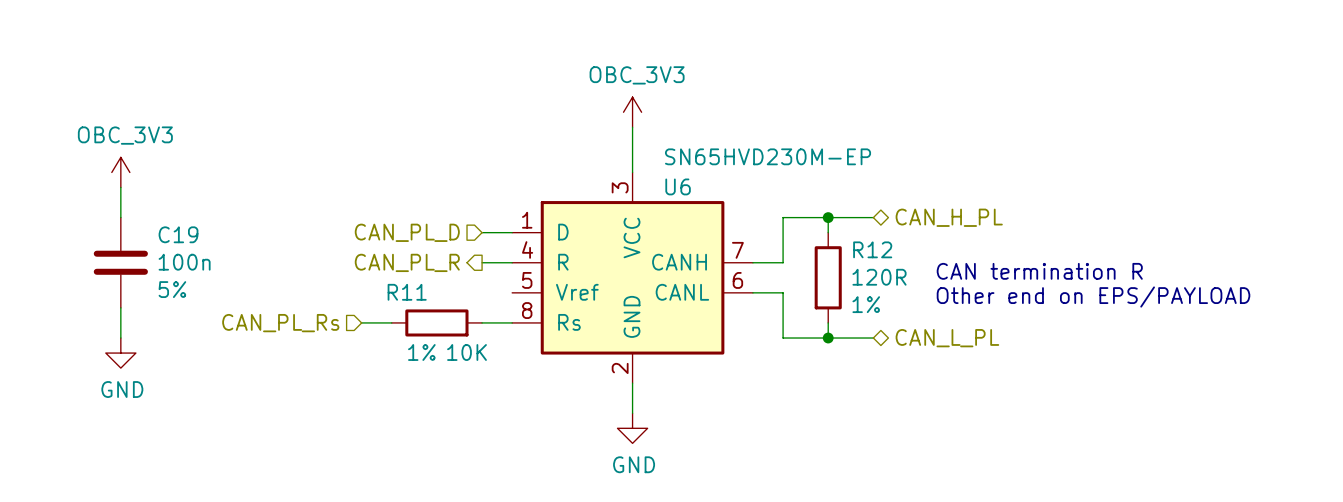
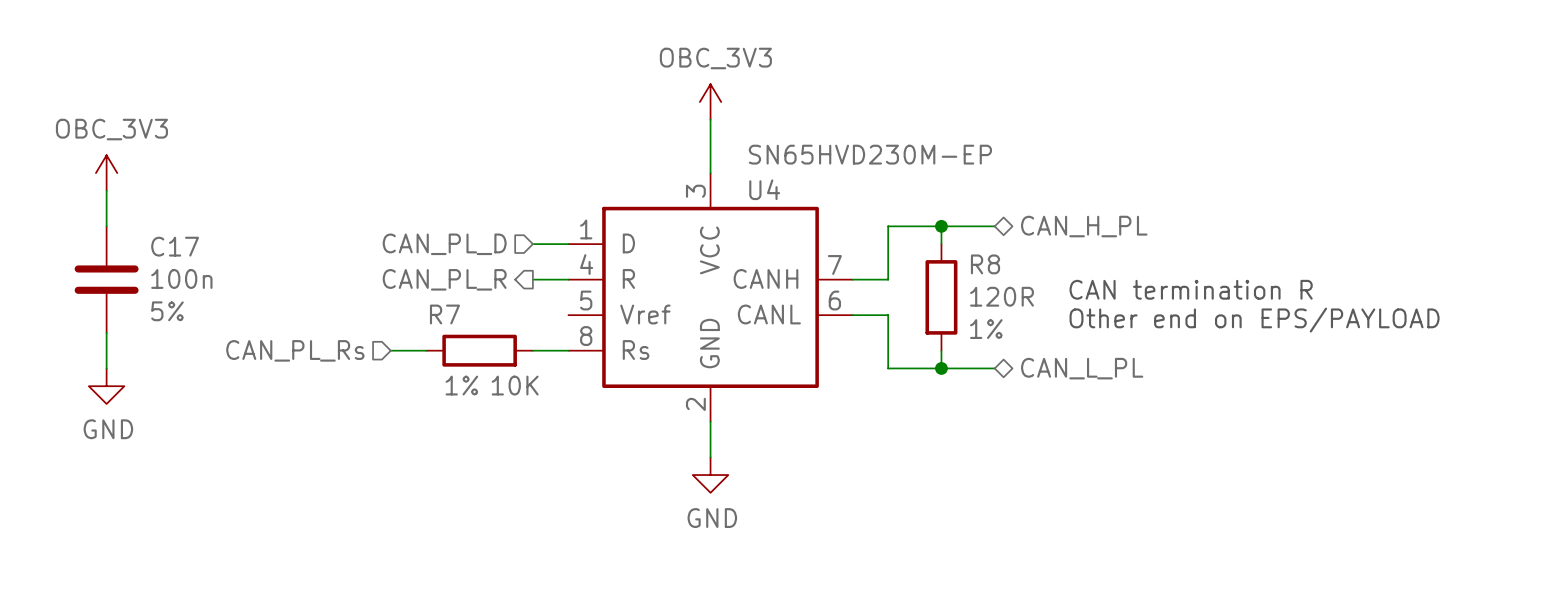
U6 name: U6 (678, 186) -> U4 (764, 189)
C19 name: C19 (178, 234) -> C17 (175, 246)
R12 name: R12 (872, 249) -> R8 (985, 264)
R11 name: R11 (407, 292) -> R7 (444, 314)

